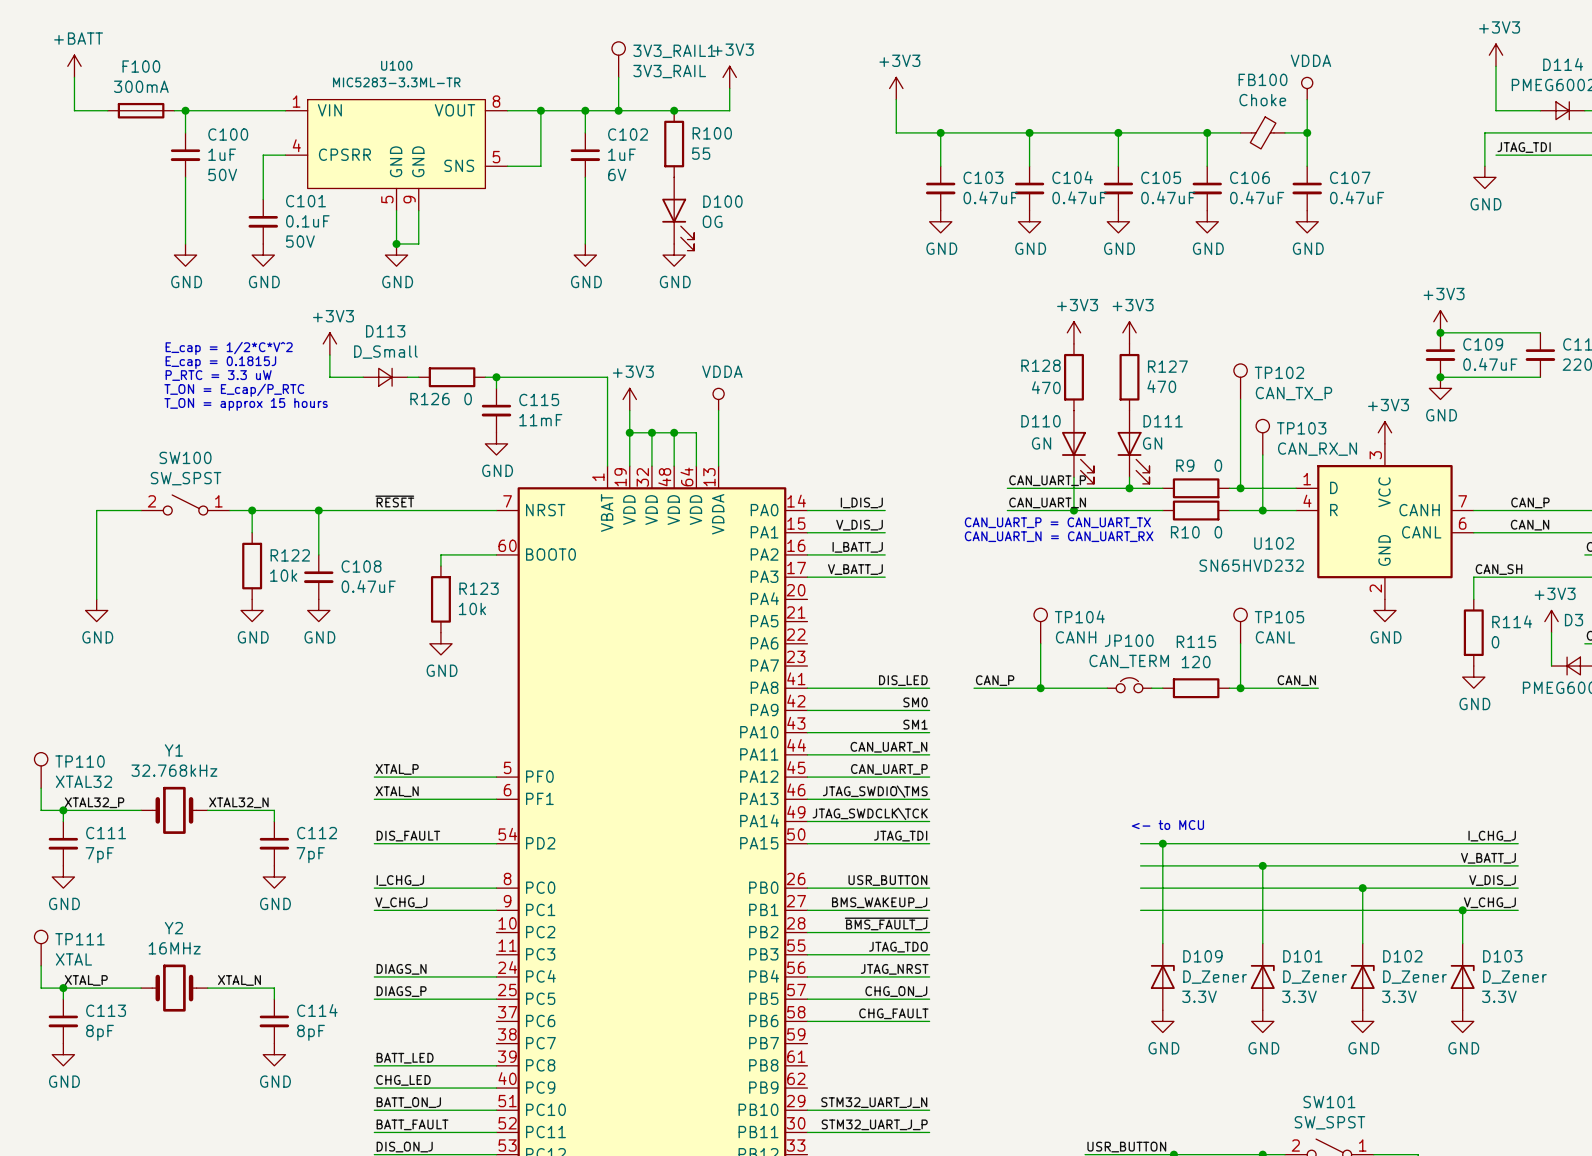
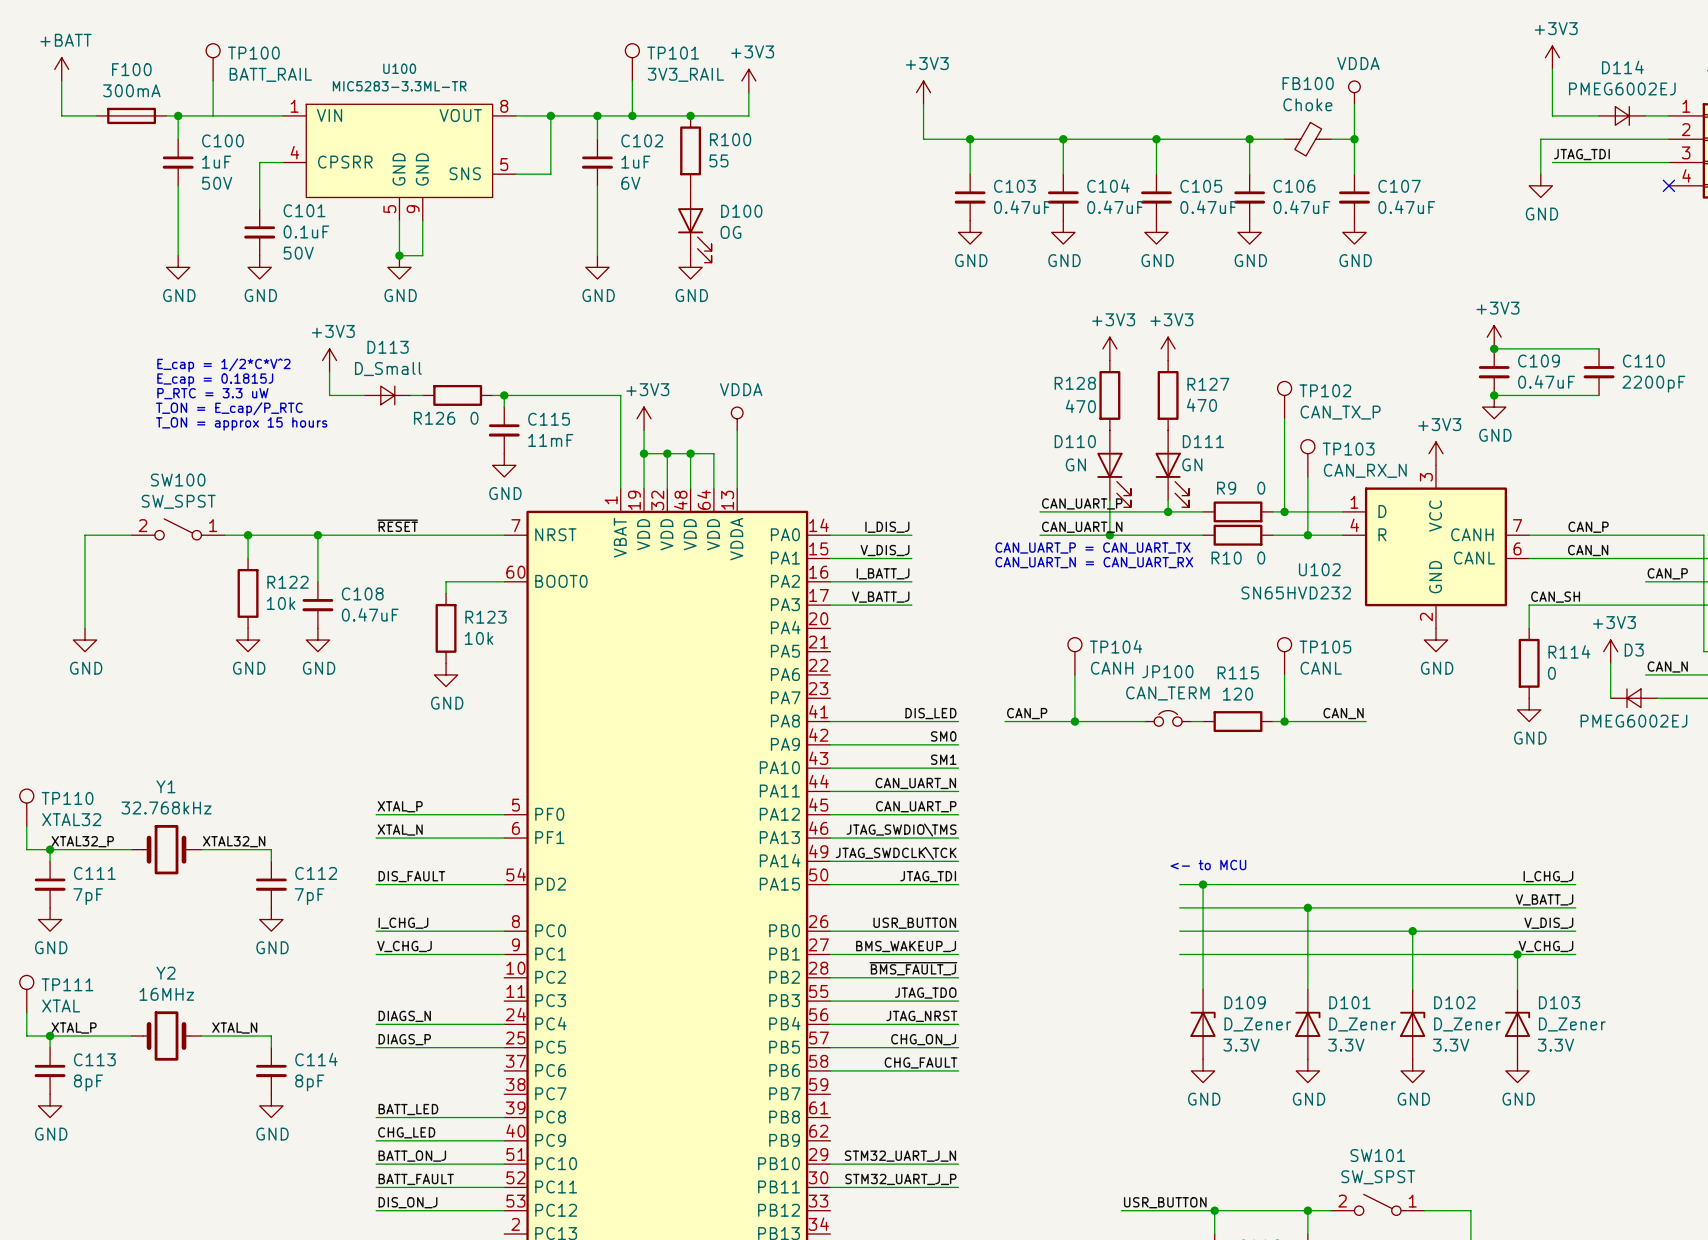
3V3_RAIL1 name: 3V3_RAIL1 (674, 51) -> TP101 (673, 53)
TP100: none -> BATT_RAIL (213, 62)
wire: none -> (213, 81) (213, 115)

